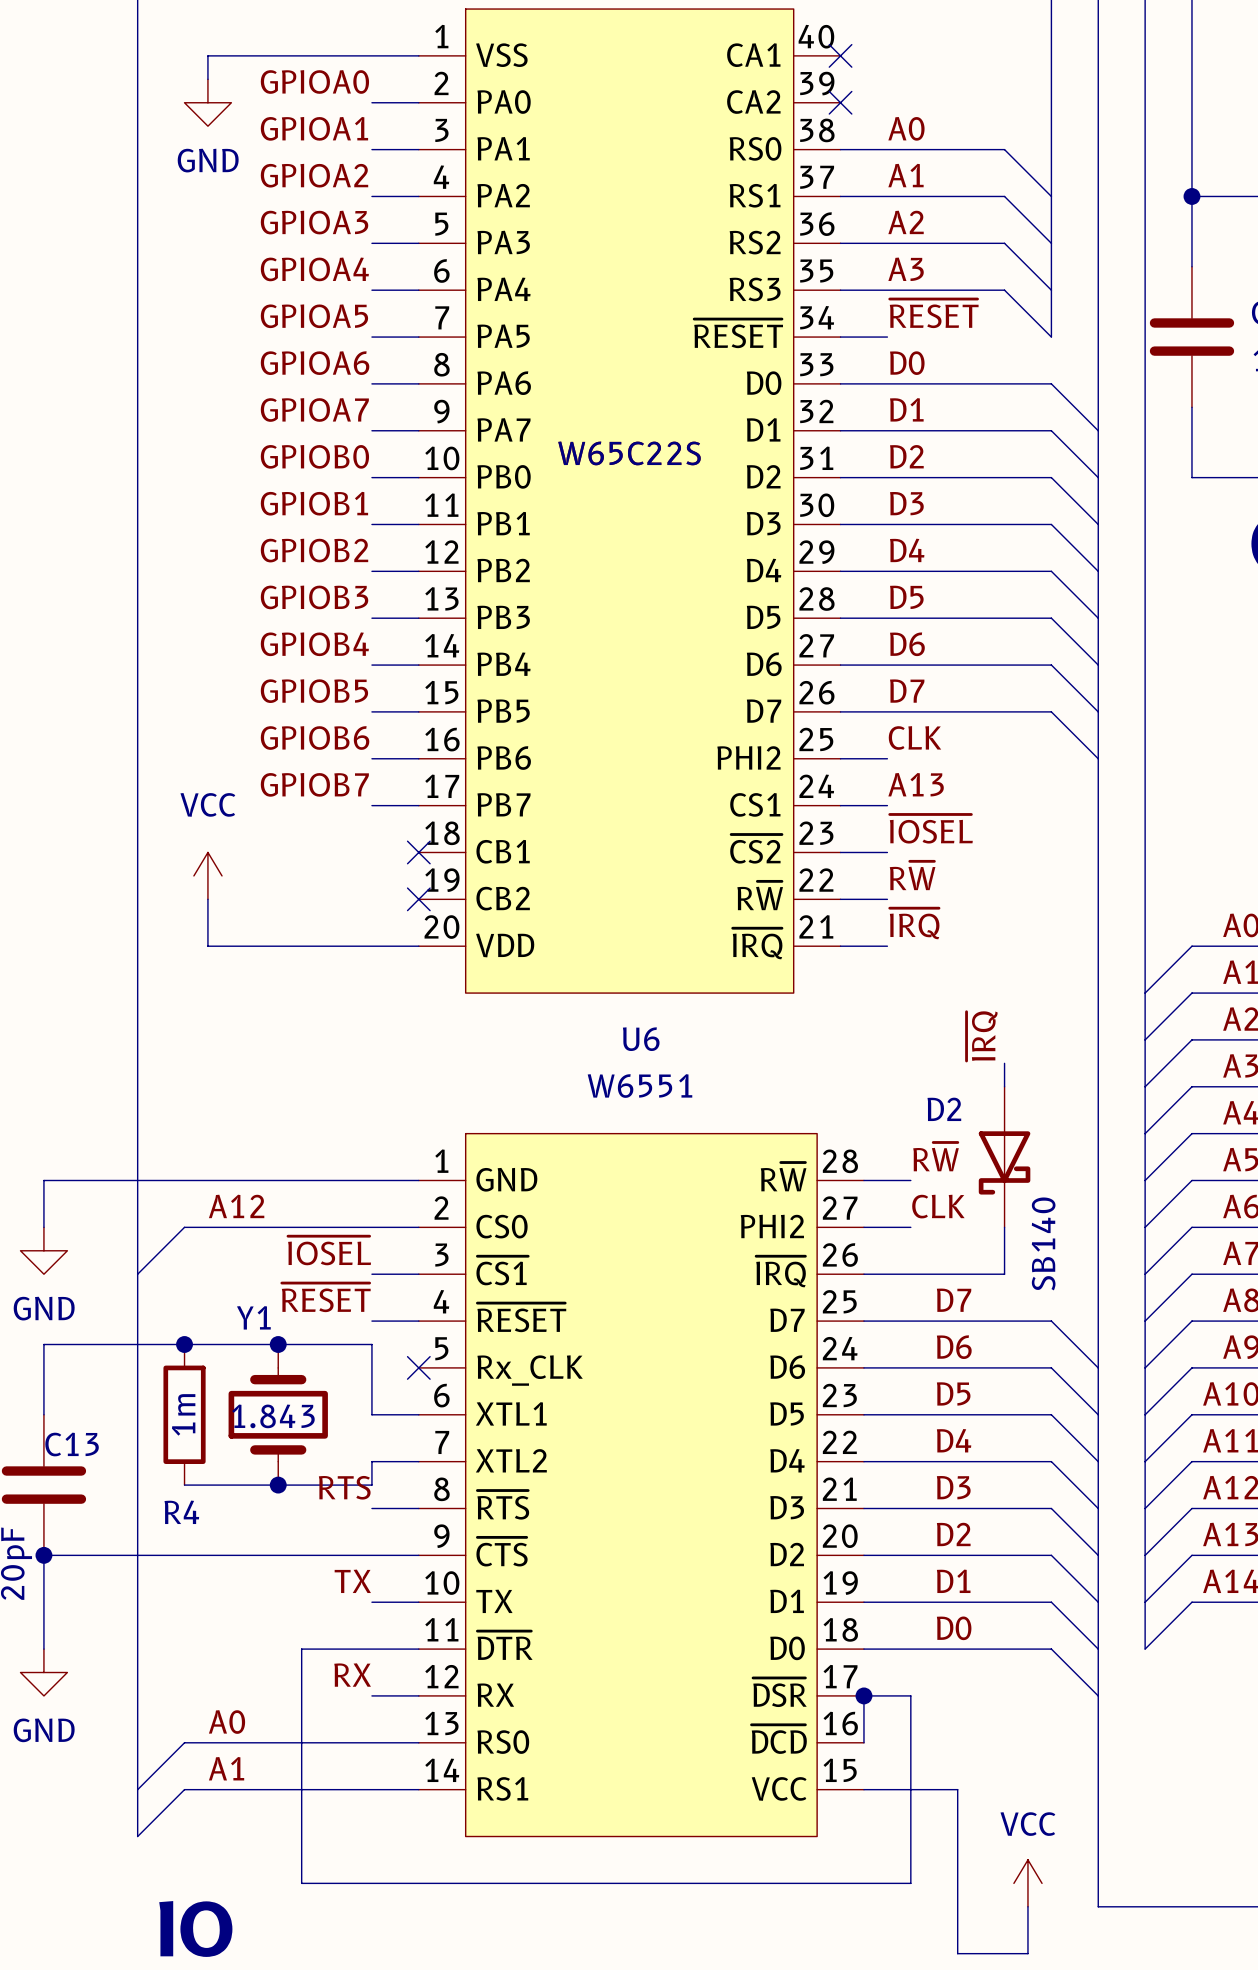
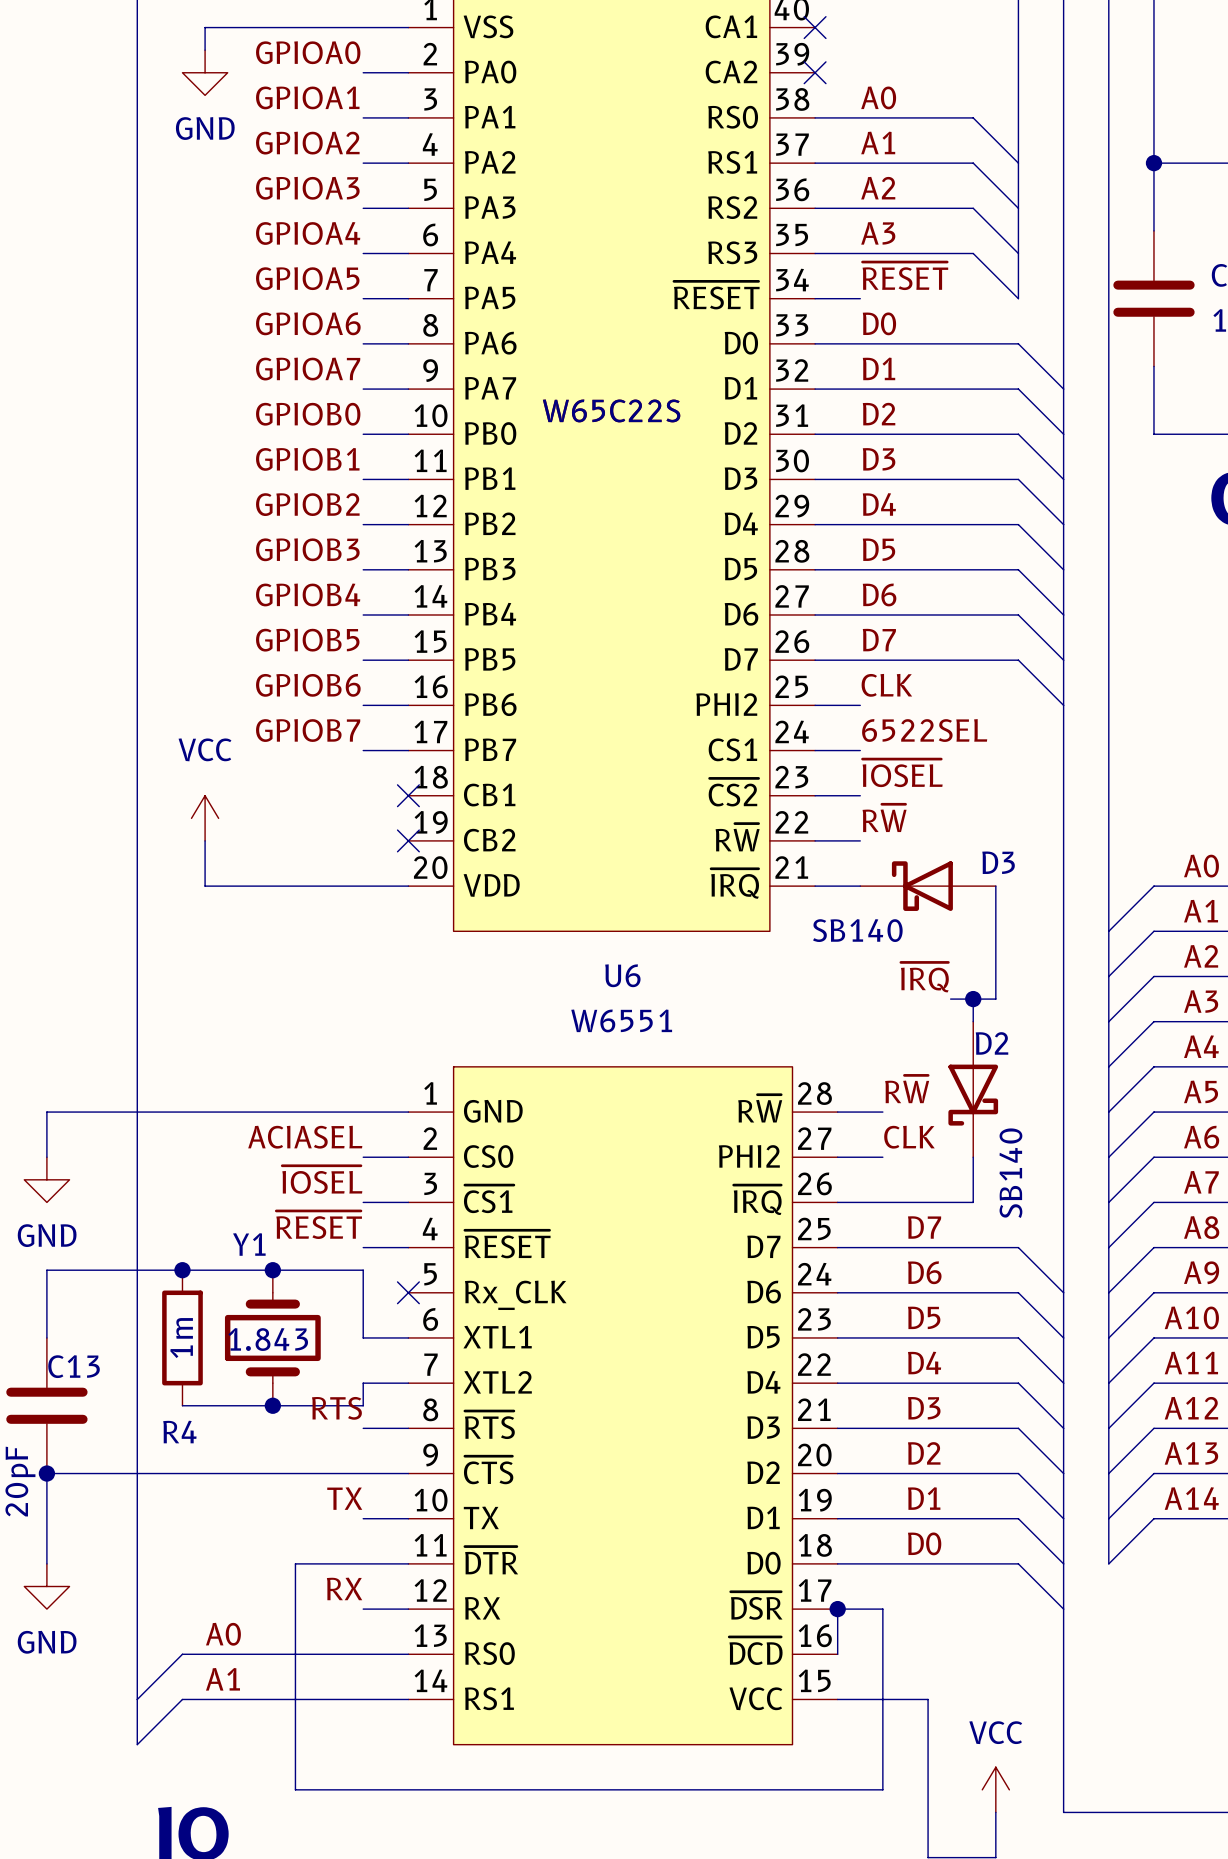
label: A13 (916, 784) -> 6522SEL (924, 730)
label: ~{IRQ} (914, 923) -> none
D3: none -> SB140 (928, 886)
wire: none -> (995, 886) (995, 999) (950, 999)
label rotation: 0° (982, 1036) -> 90° clockwise (924, 977)
junction: none -> (973, 999)
D2 name position: D2 (944, 1109) -> D2 (992, 1043)
label: A12 (236, 1206) -> none
label: none -> ACIASEL (305, 1137)
wire: (371, 1227) (184, 1227) (137, 1274) -> none

